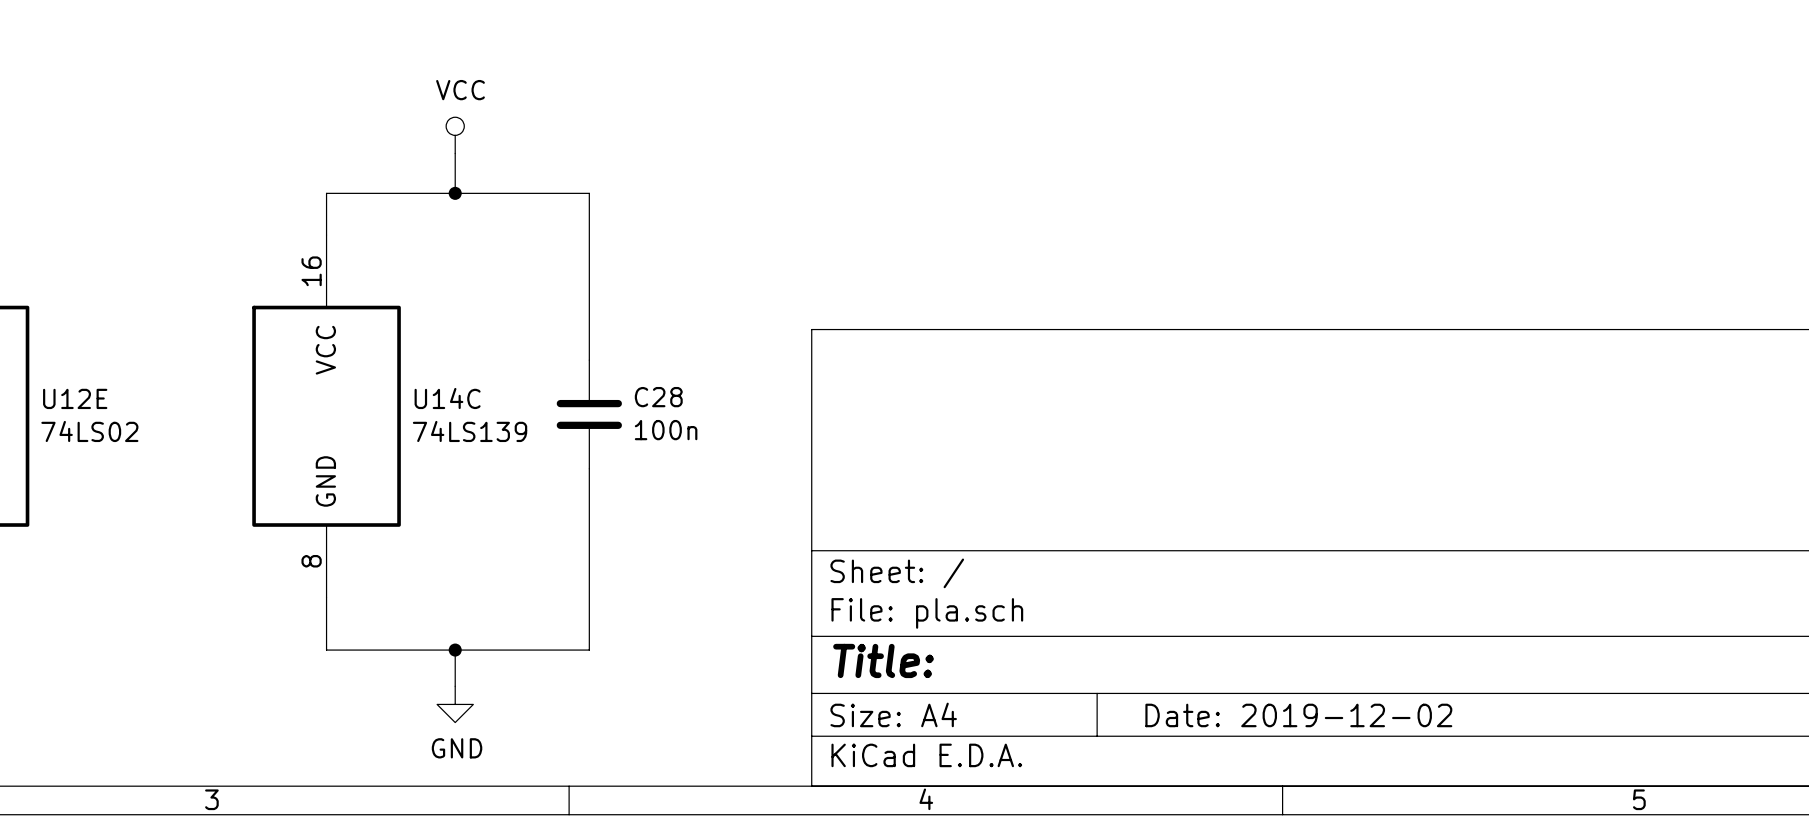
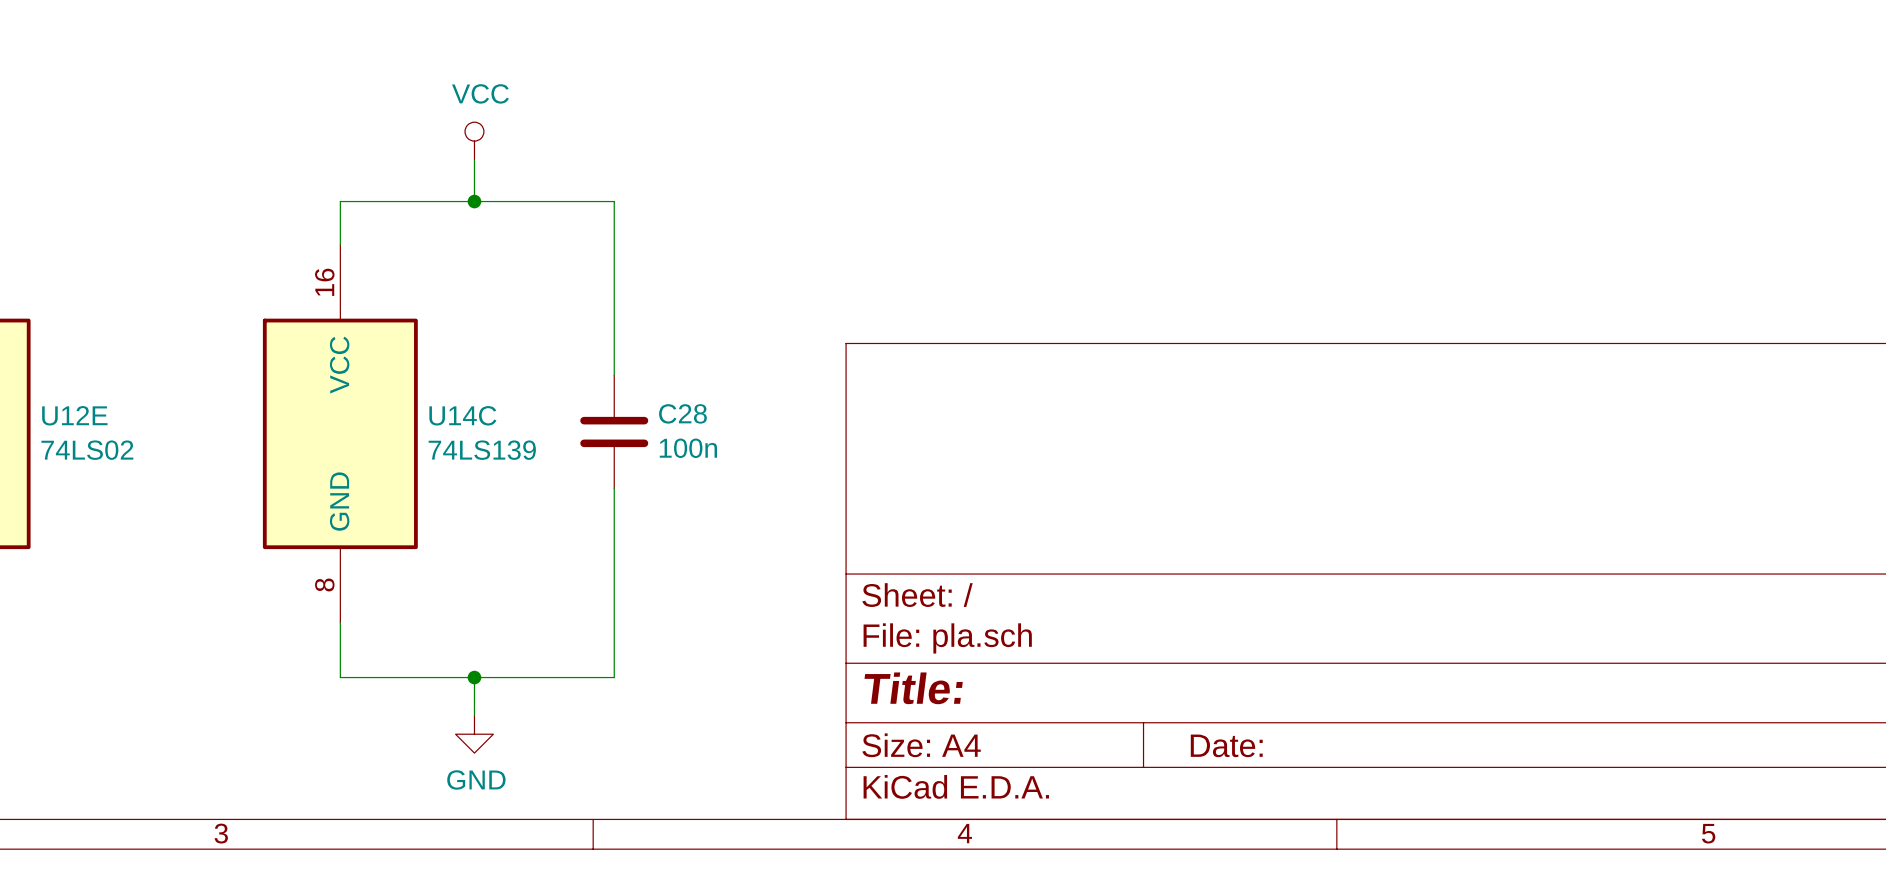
title block: Date: 2019-12-02 (1298, 715) -> Date: (1226, 745)

